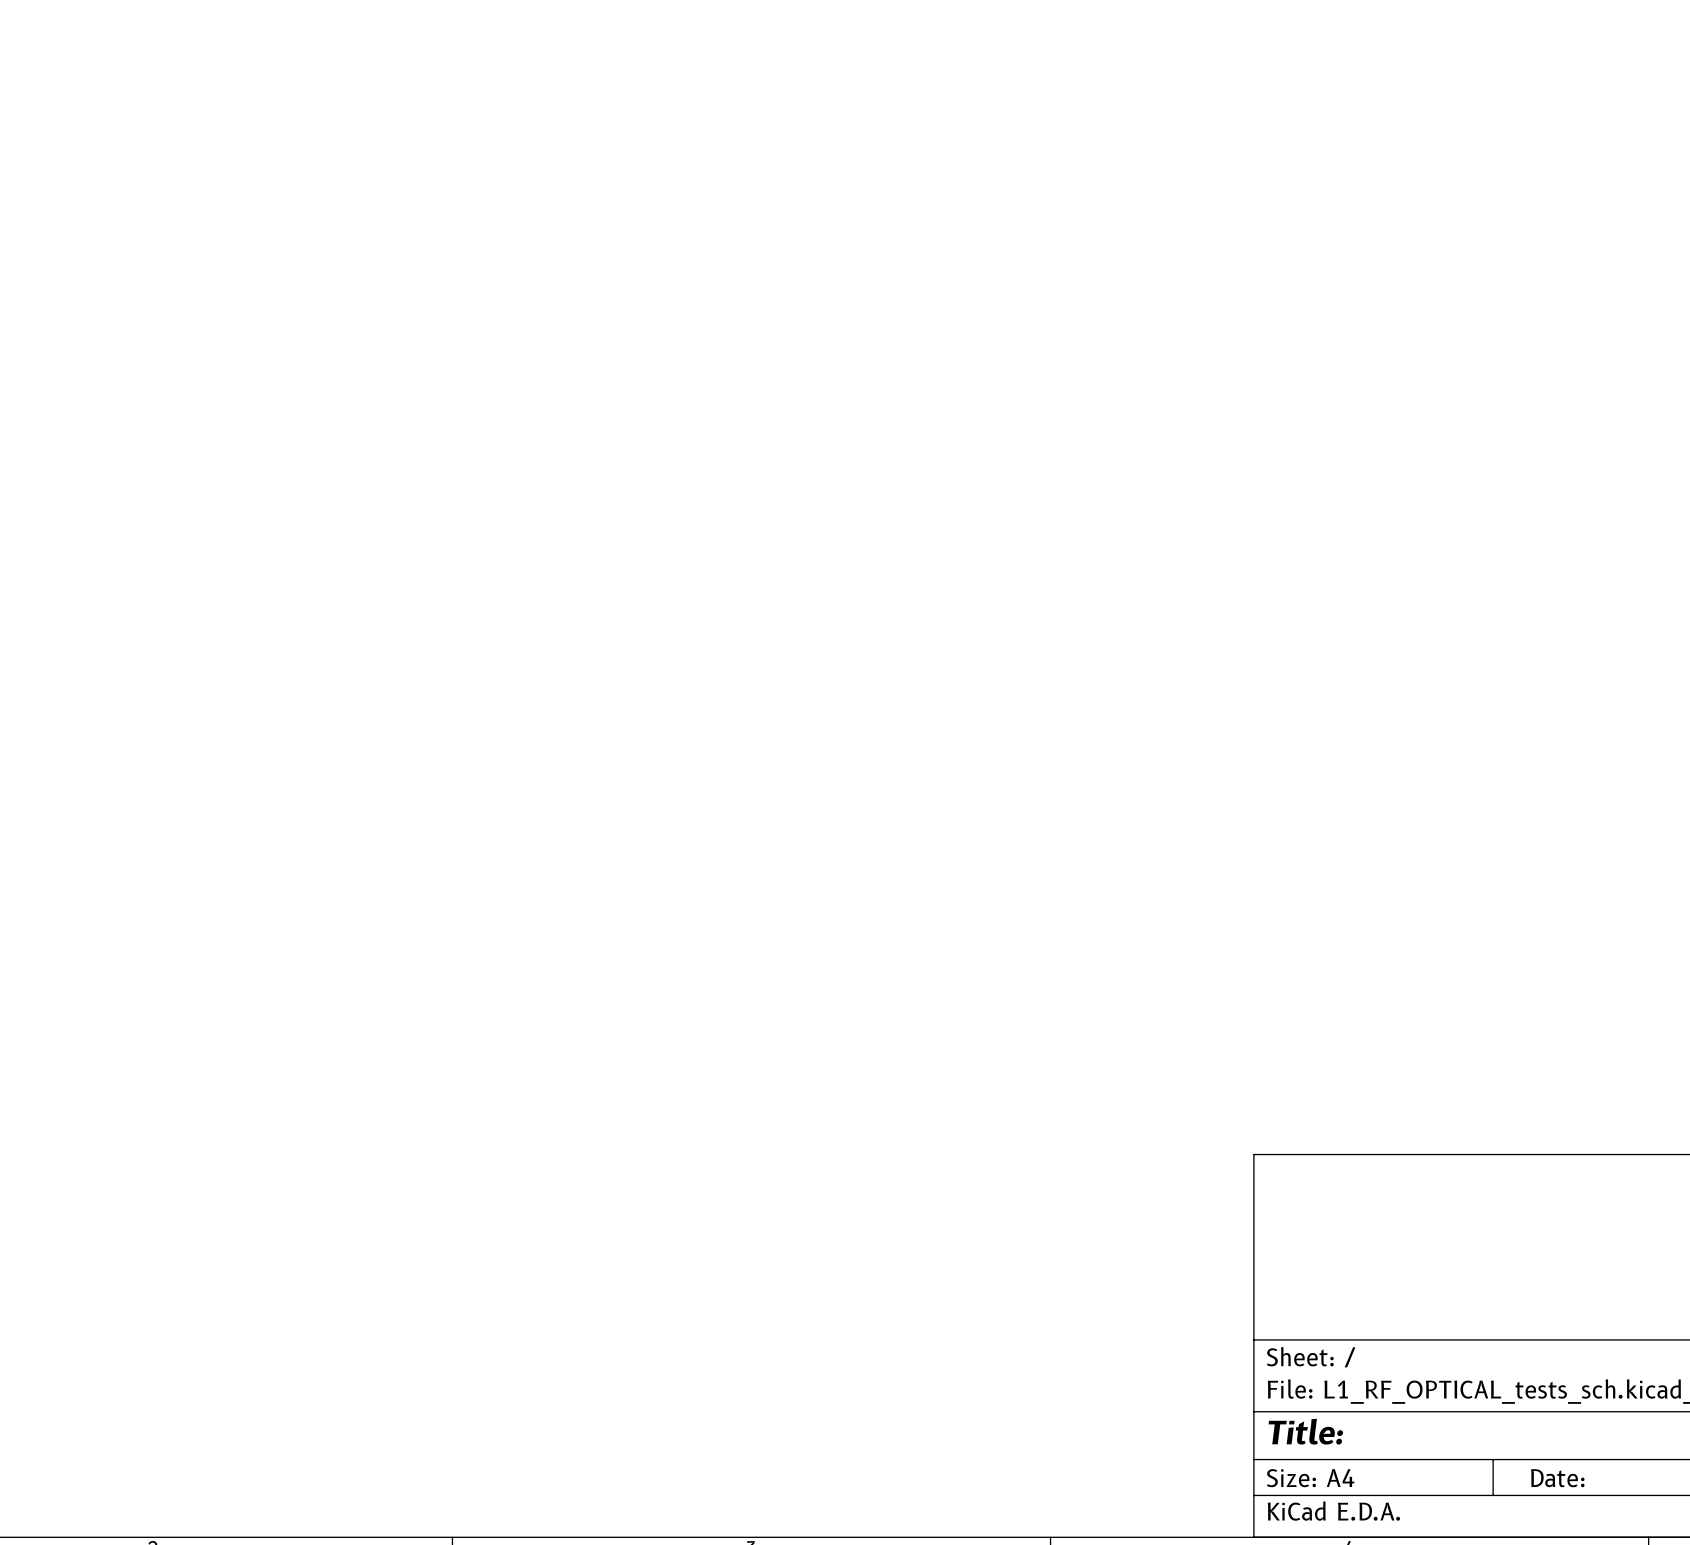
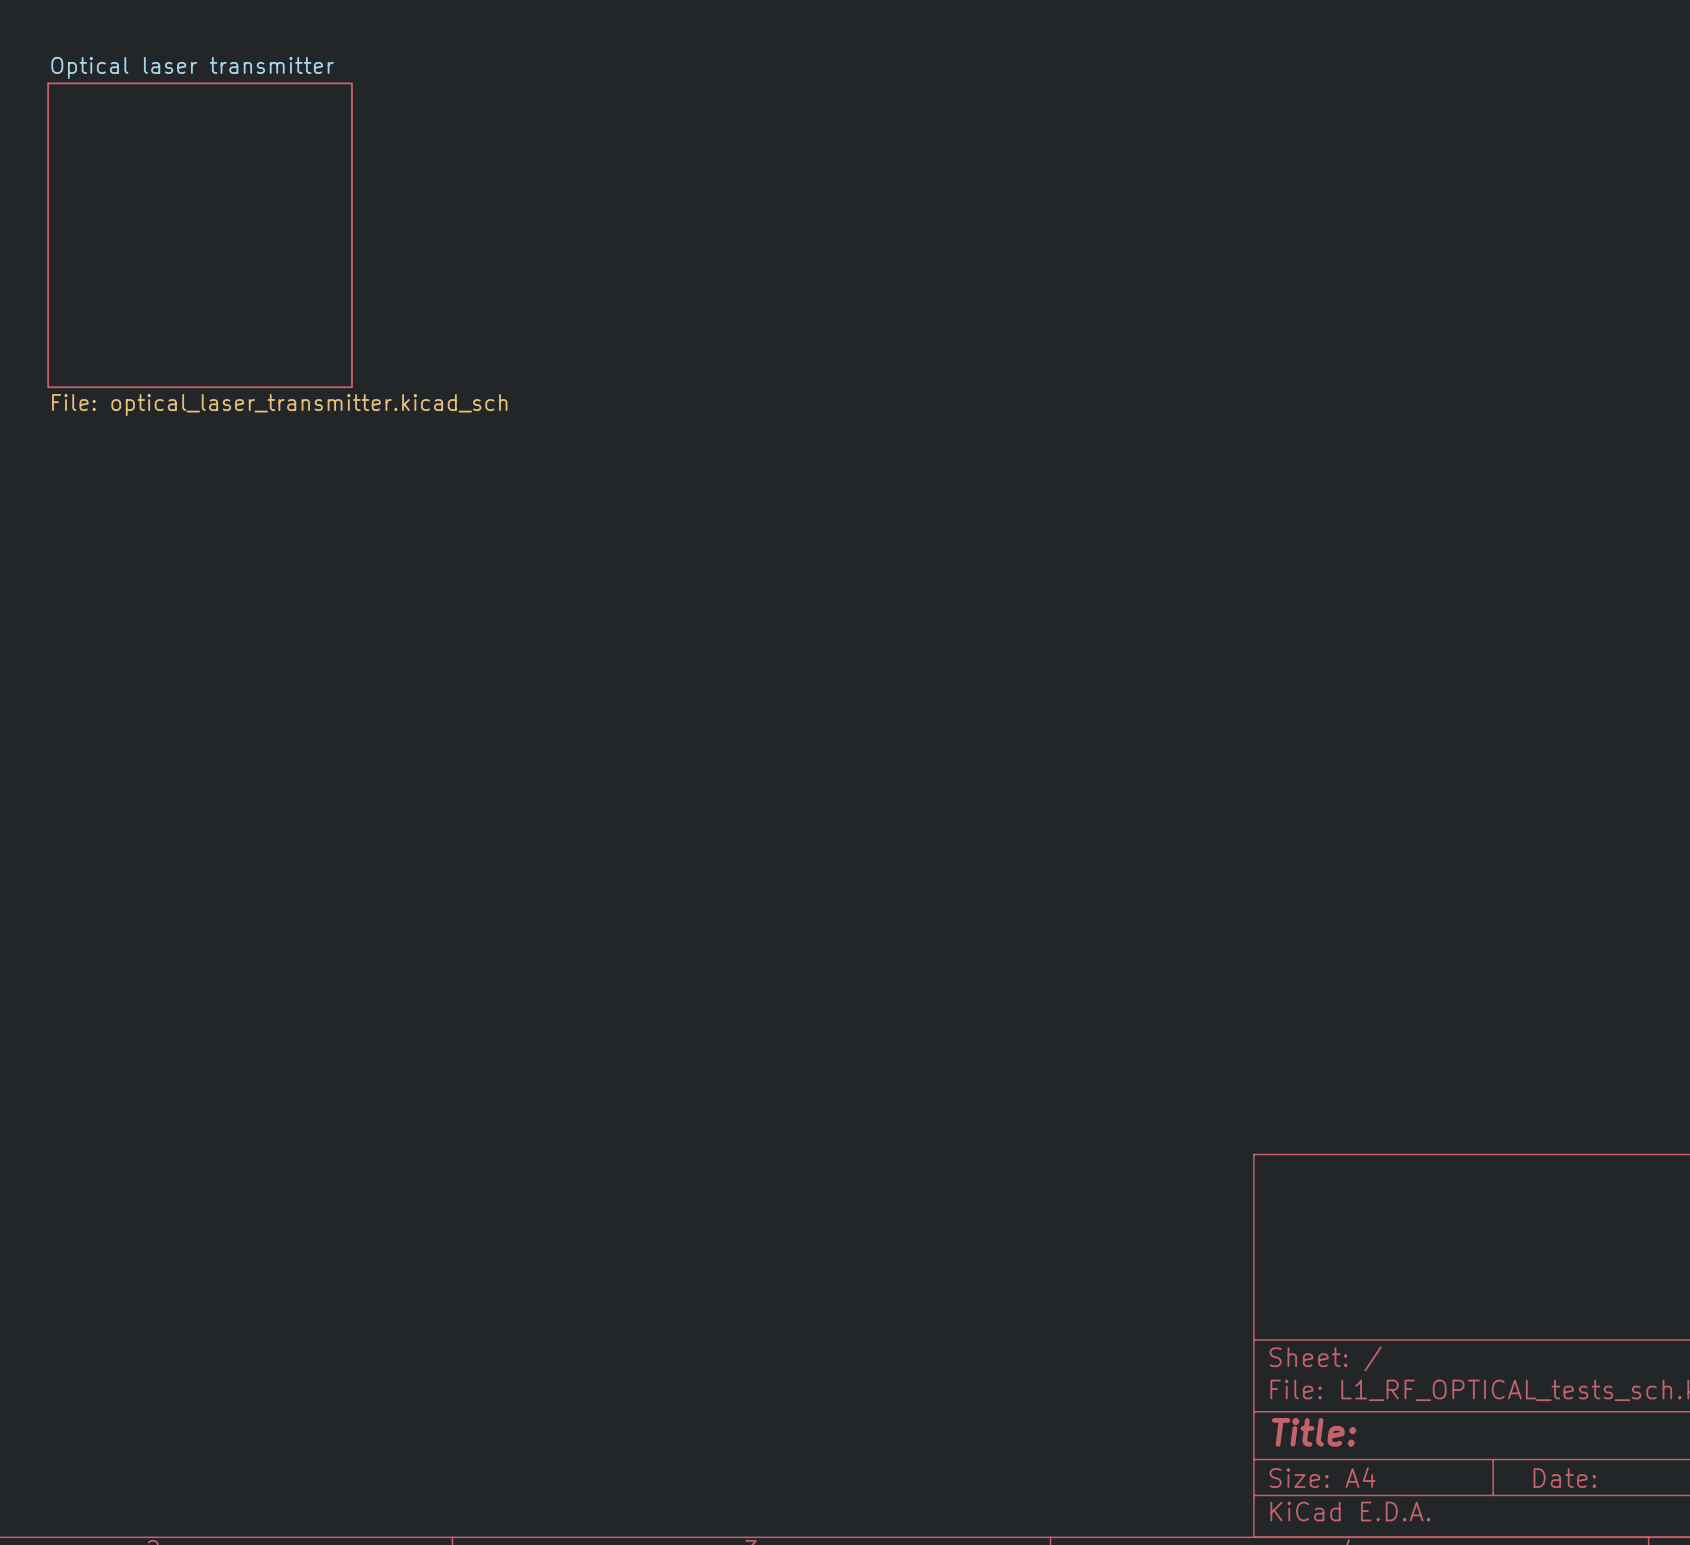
sheet Optical laser transmitter: none -> File: optical_laser_transmitter.kicad_sch (200, 235)

